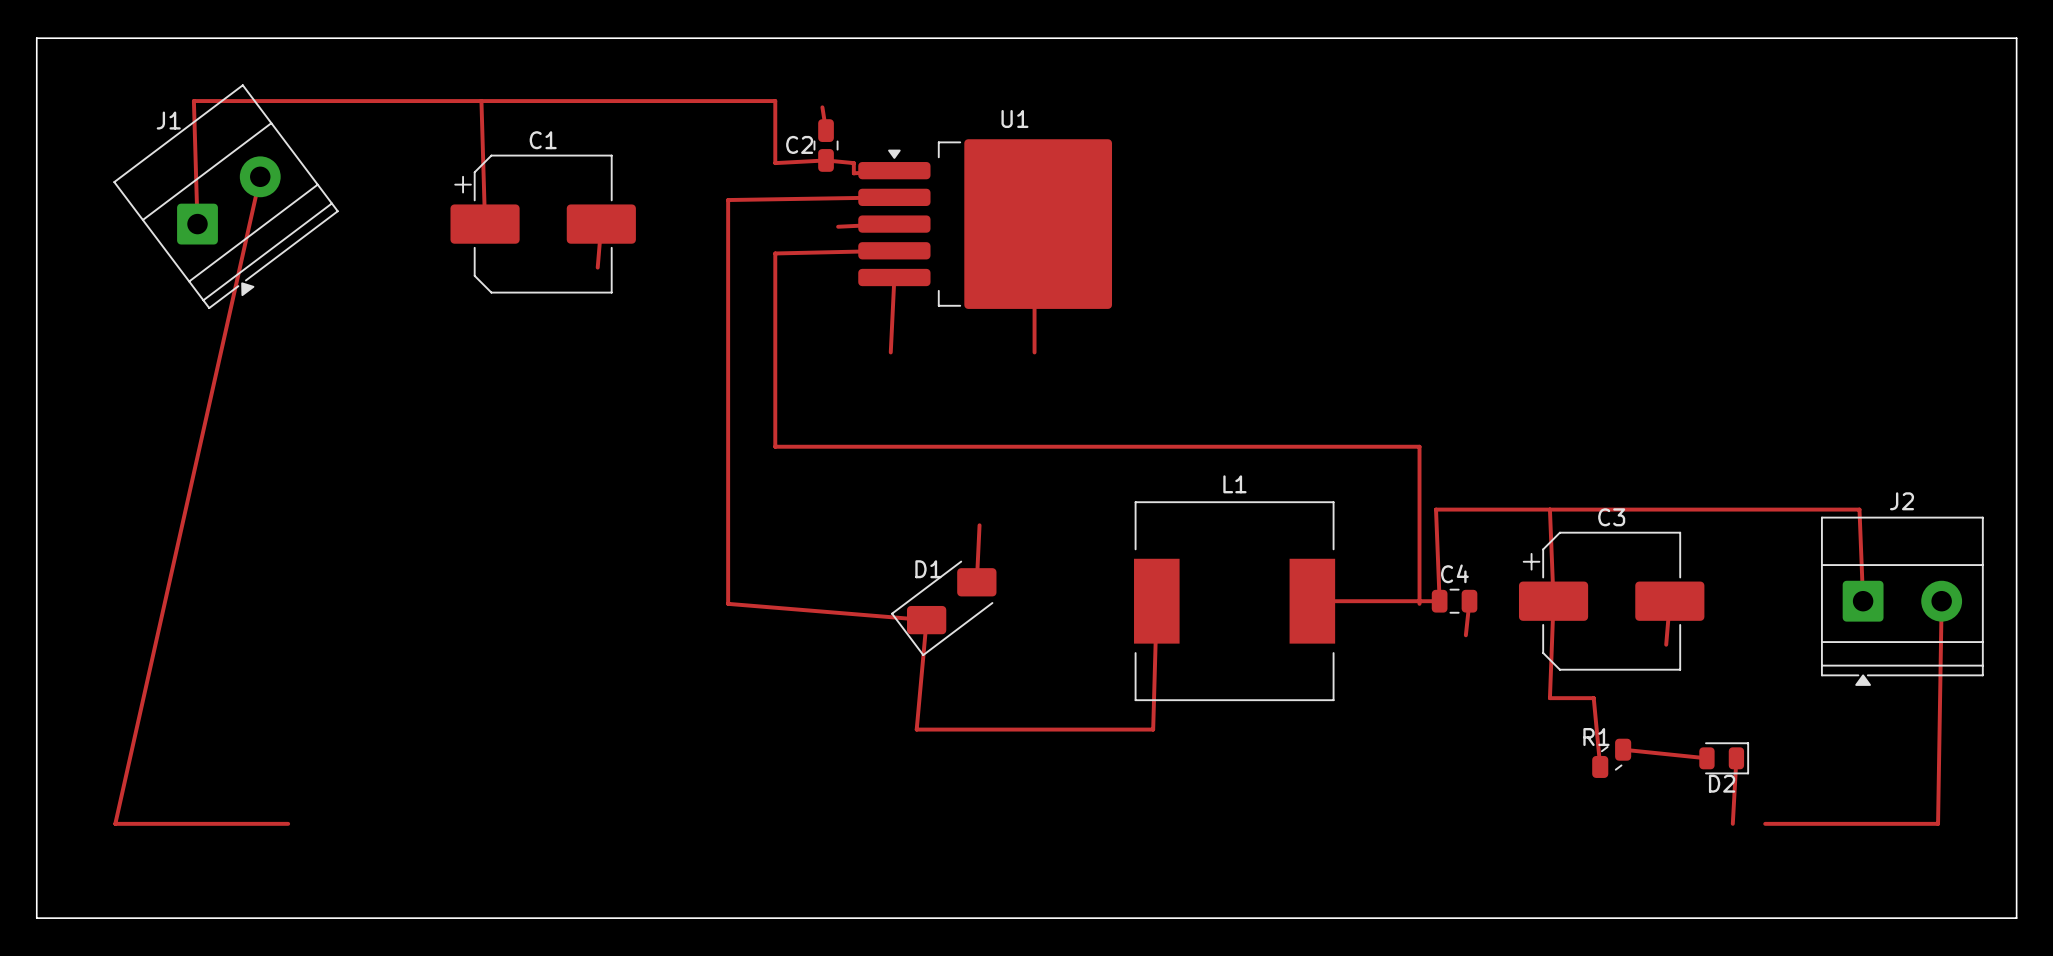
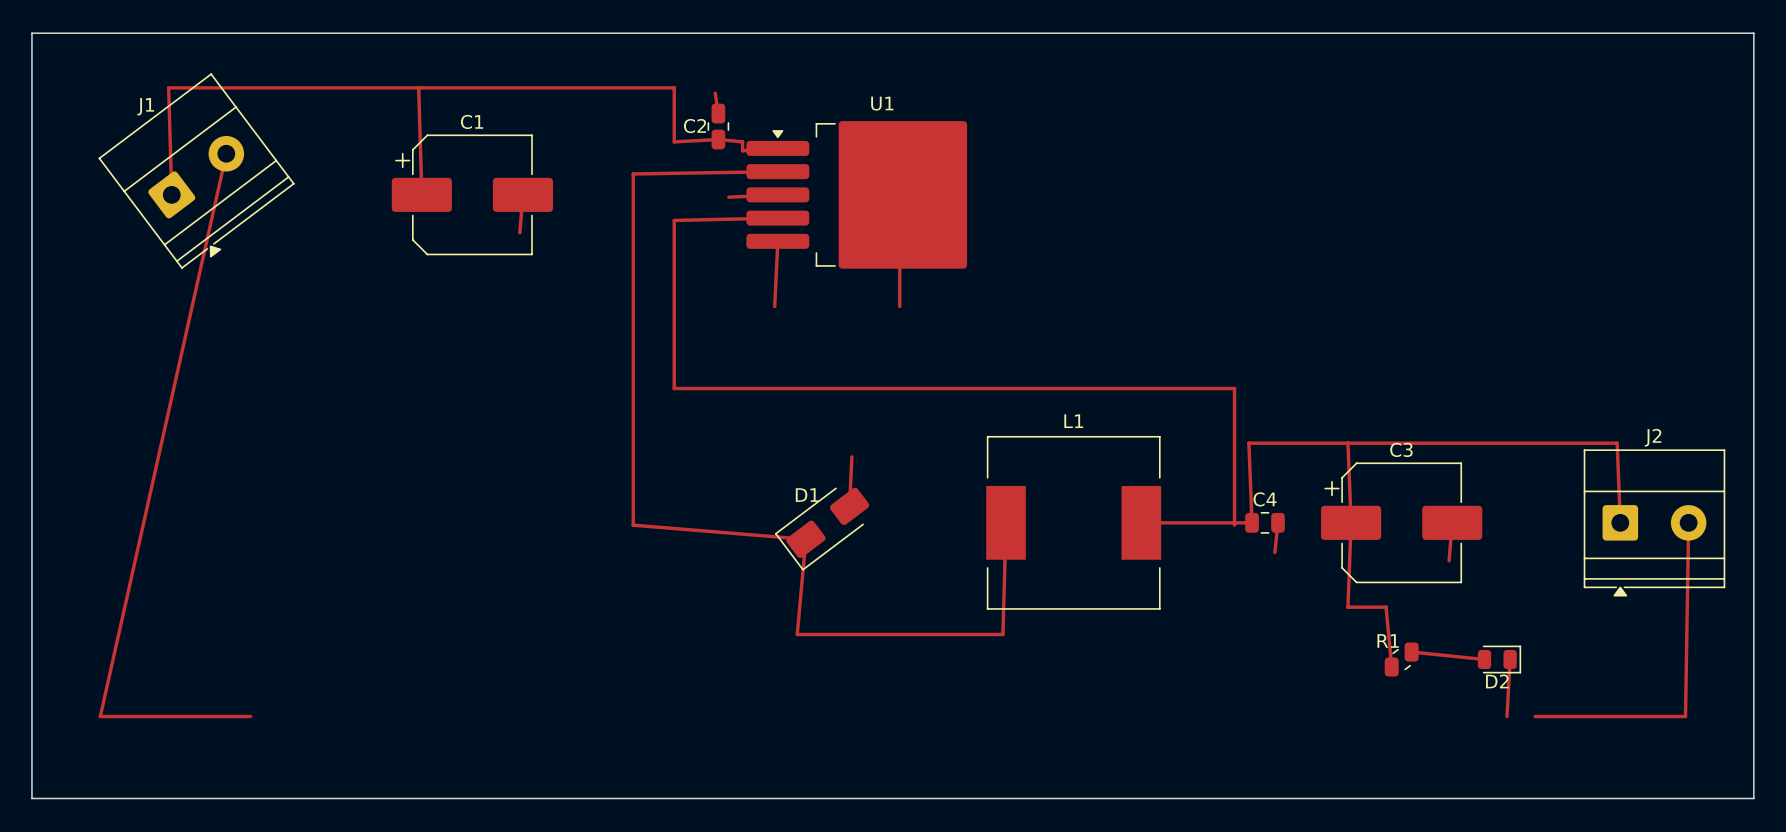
J1 footprint: [113, 84, 339, 310] -> [98, 73, 295, 269]
D1 footprint: [891, 560, 997, 657] -> [775, 487, 870, 571]

